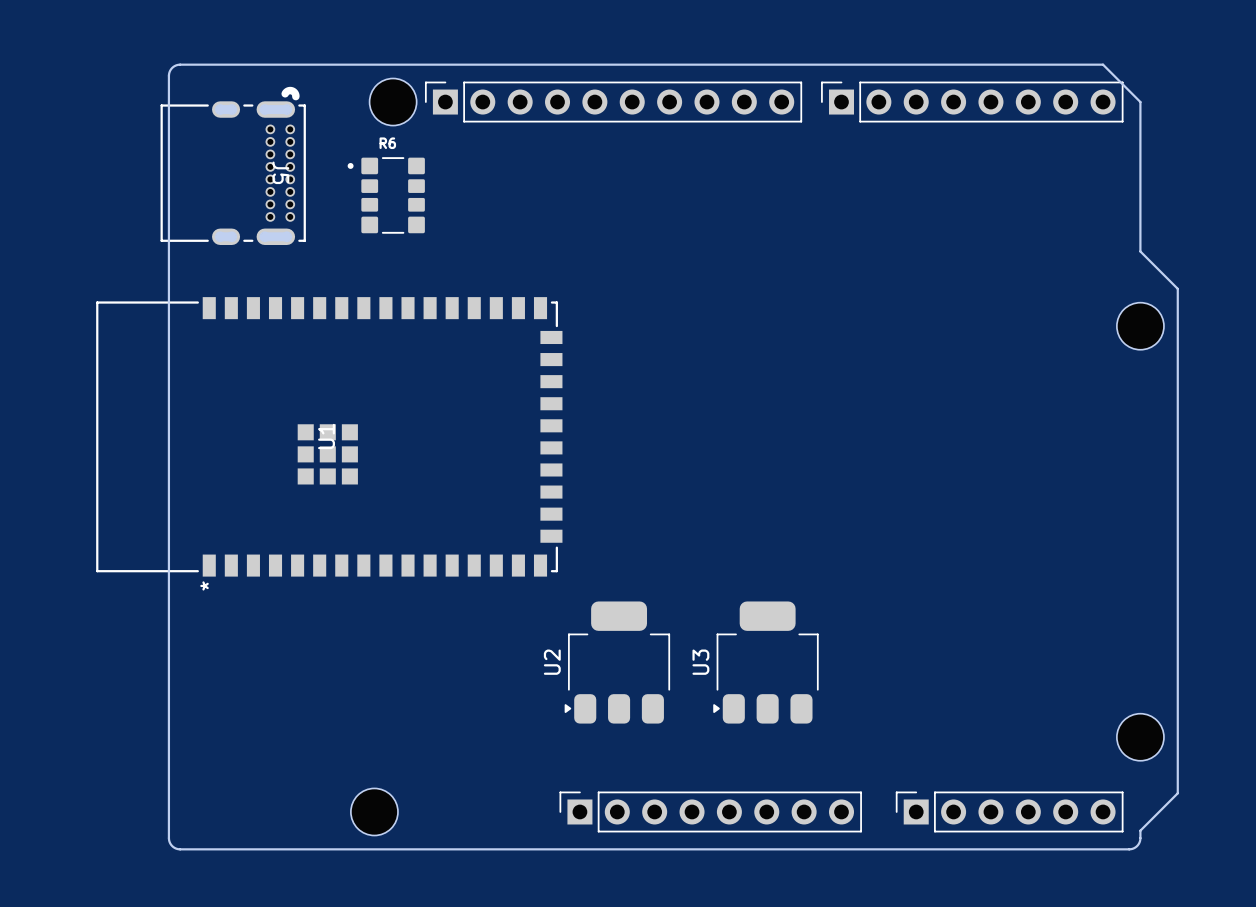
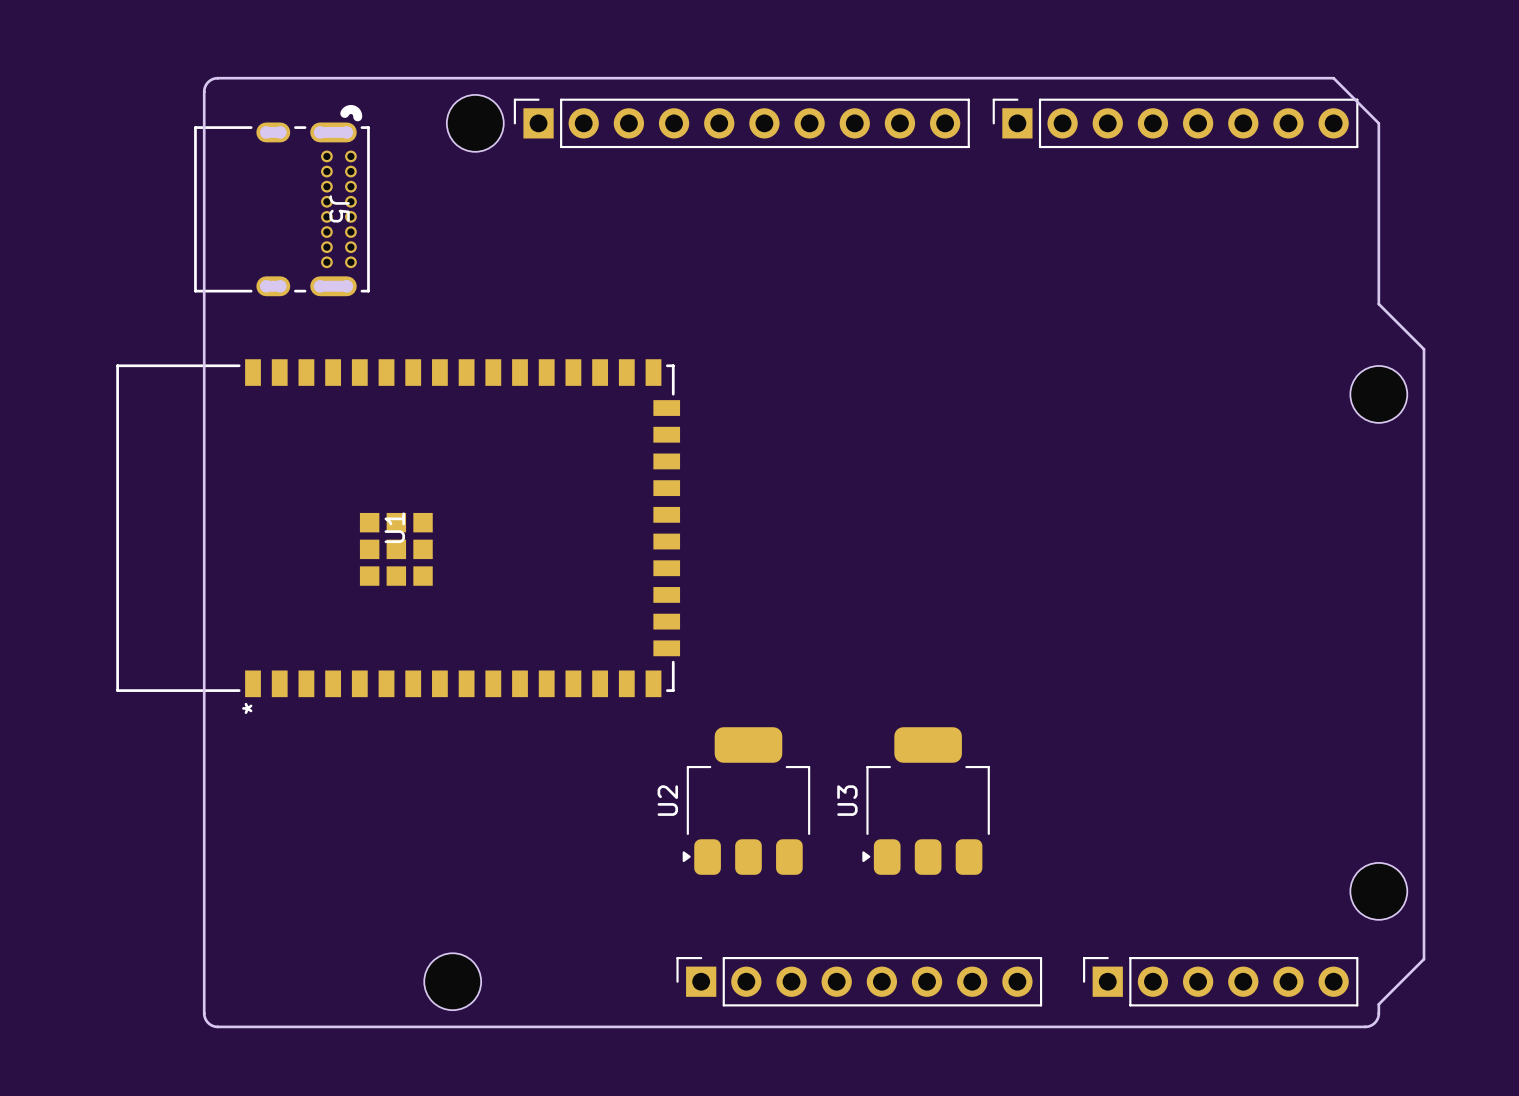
R6: (386, 195) -> none

